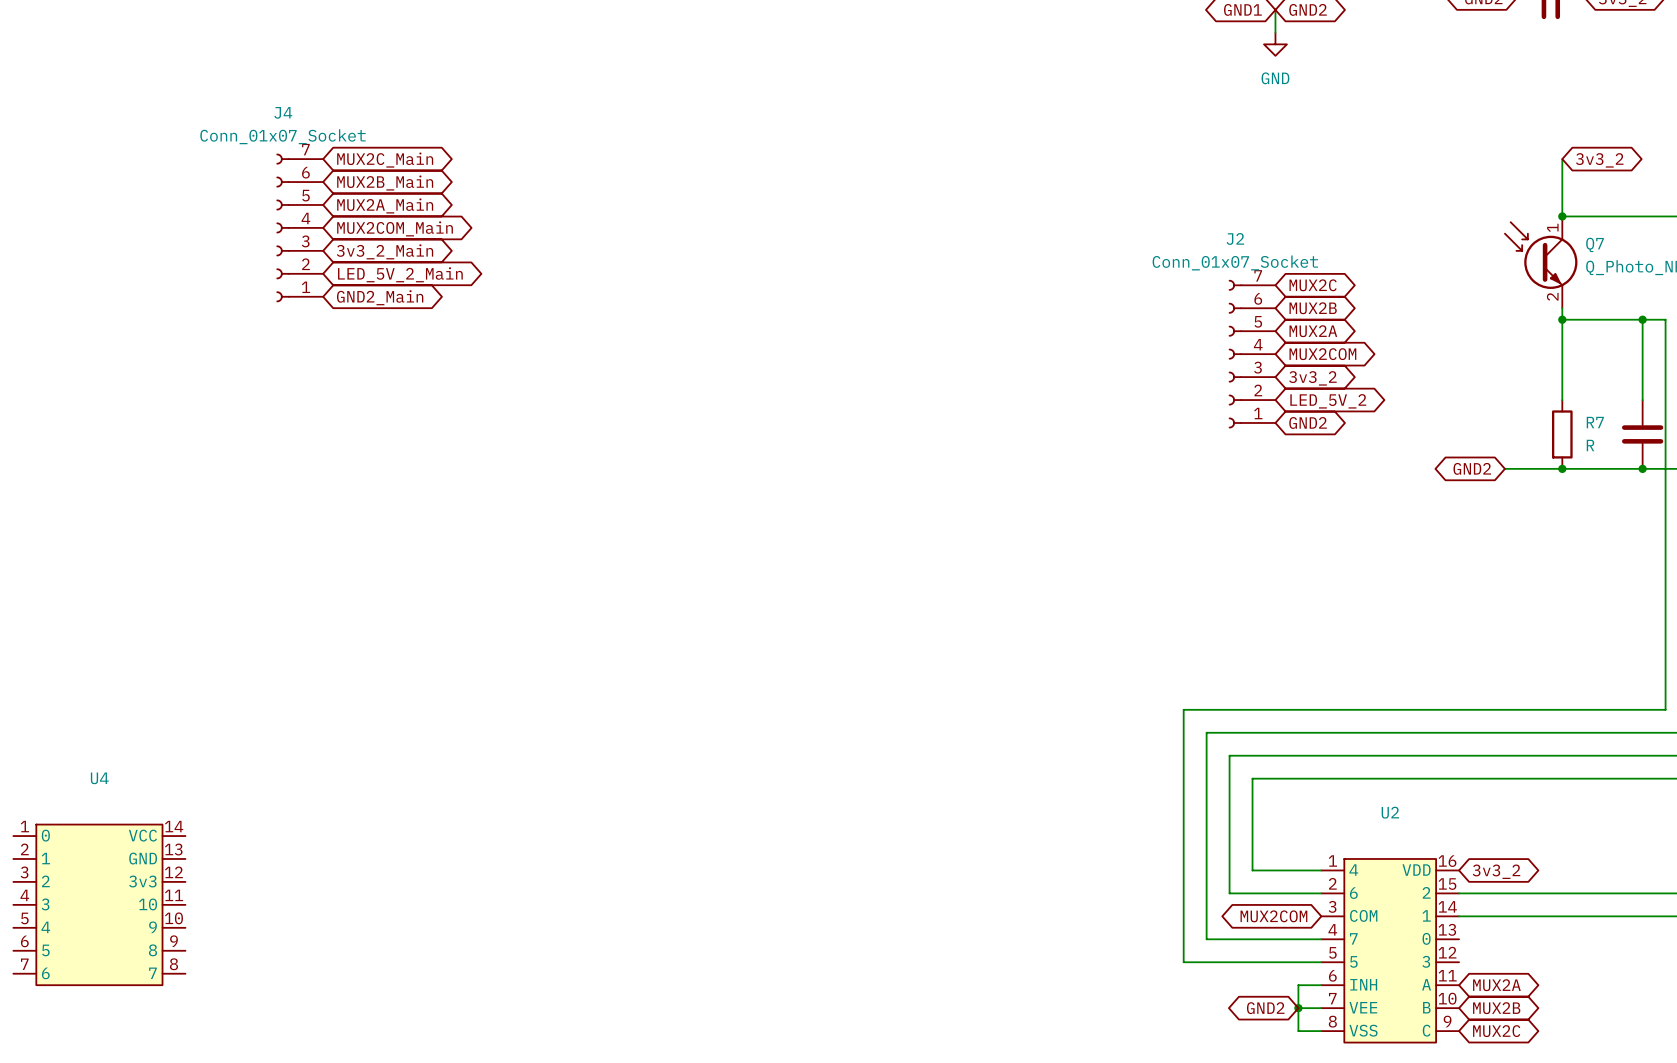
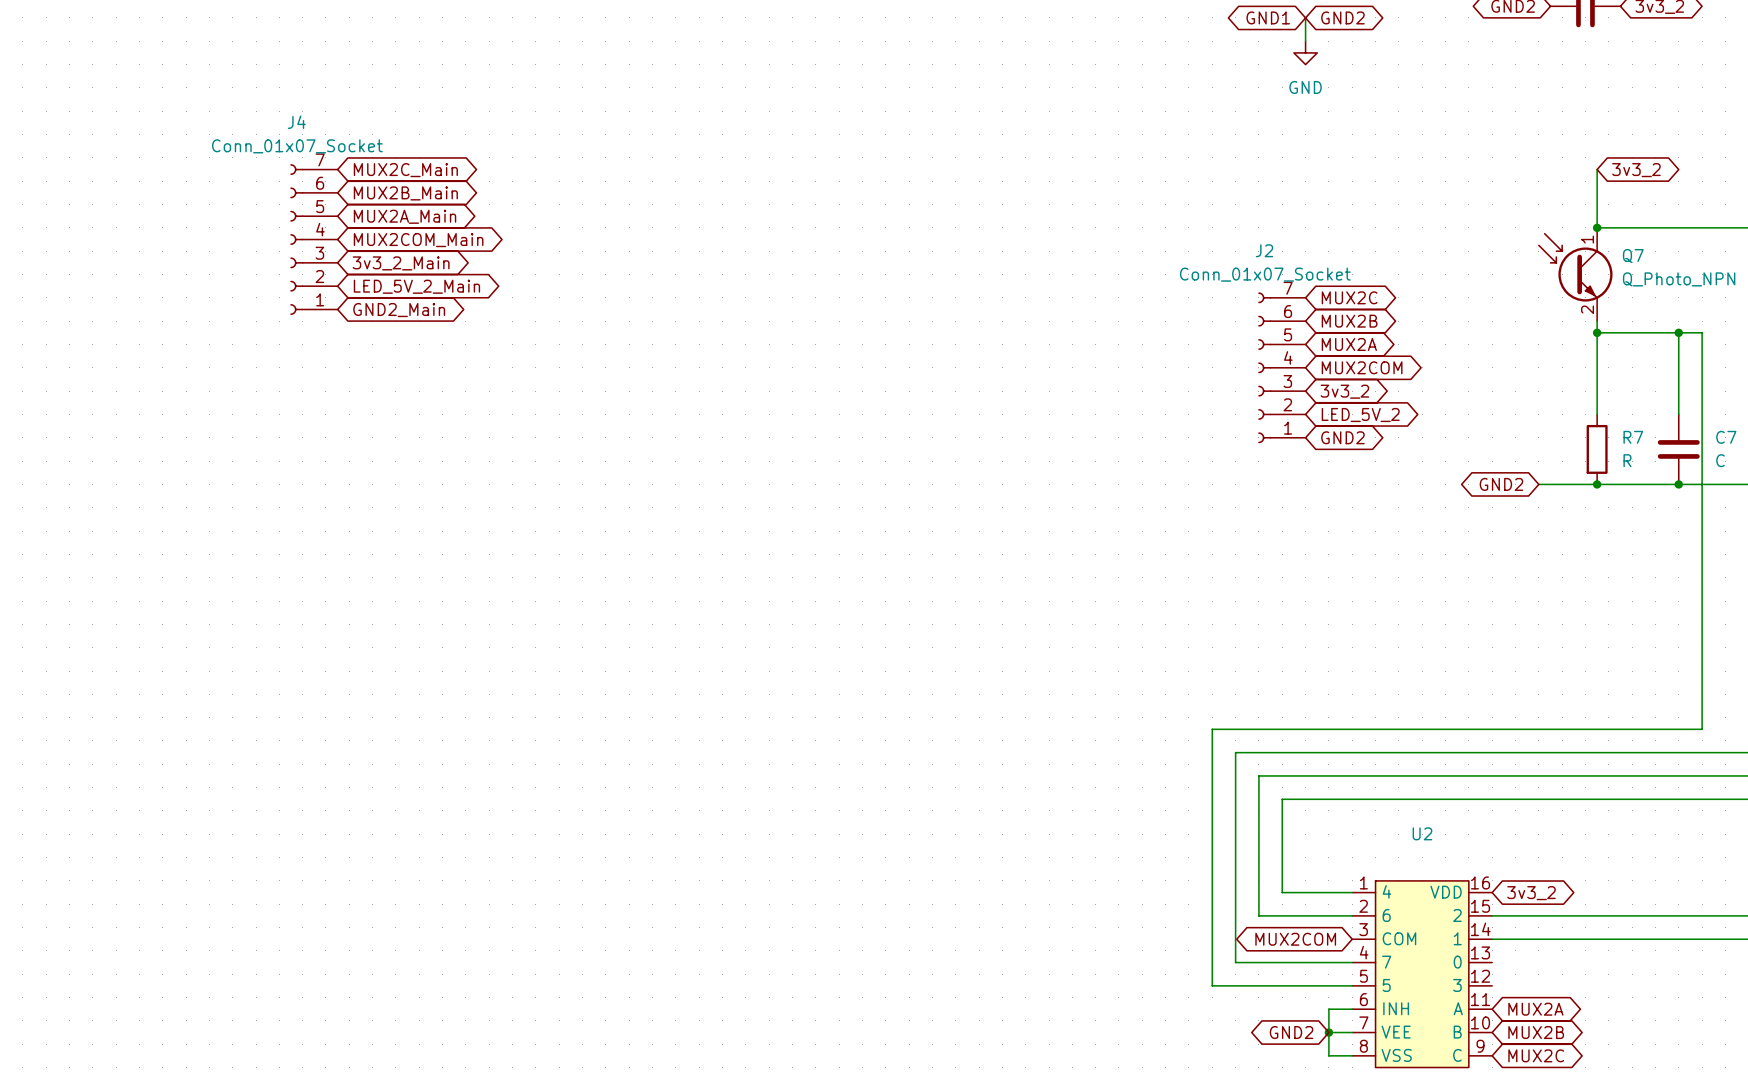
U4: (99, 904) -> none

